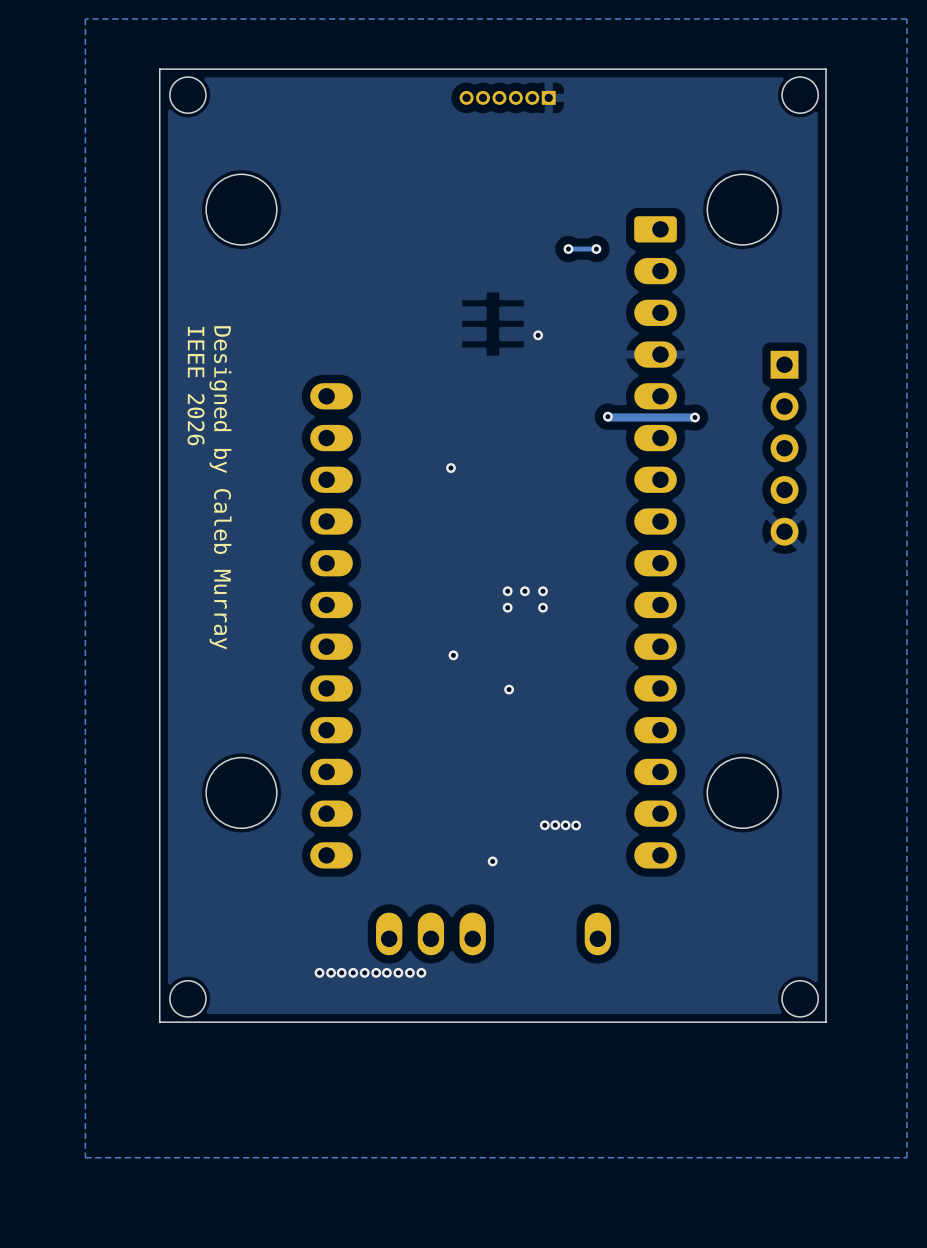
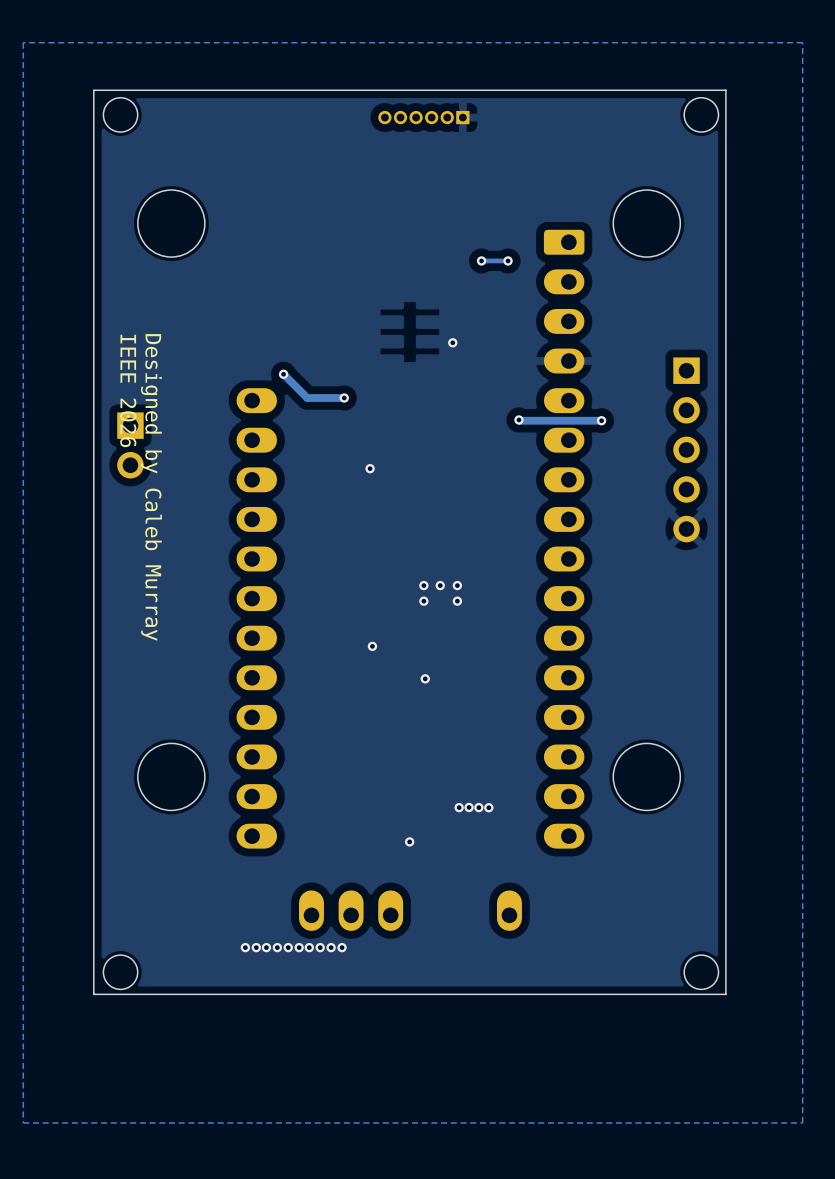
track: none -> (283, 374) (307, 398) (344, 398)
via: none -> (283, 374)
via: none -> (344, 398)
part: none -> (130, 445)

